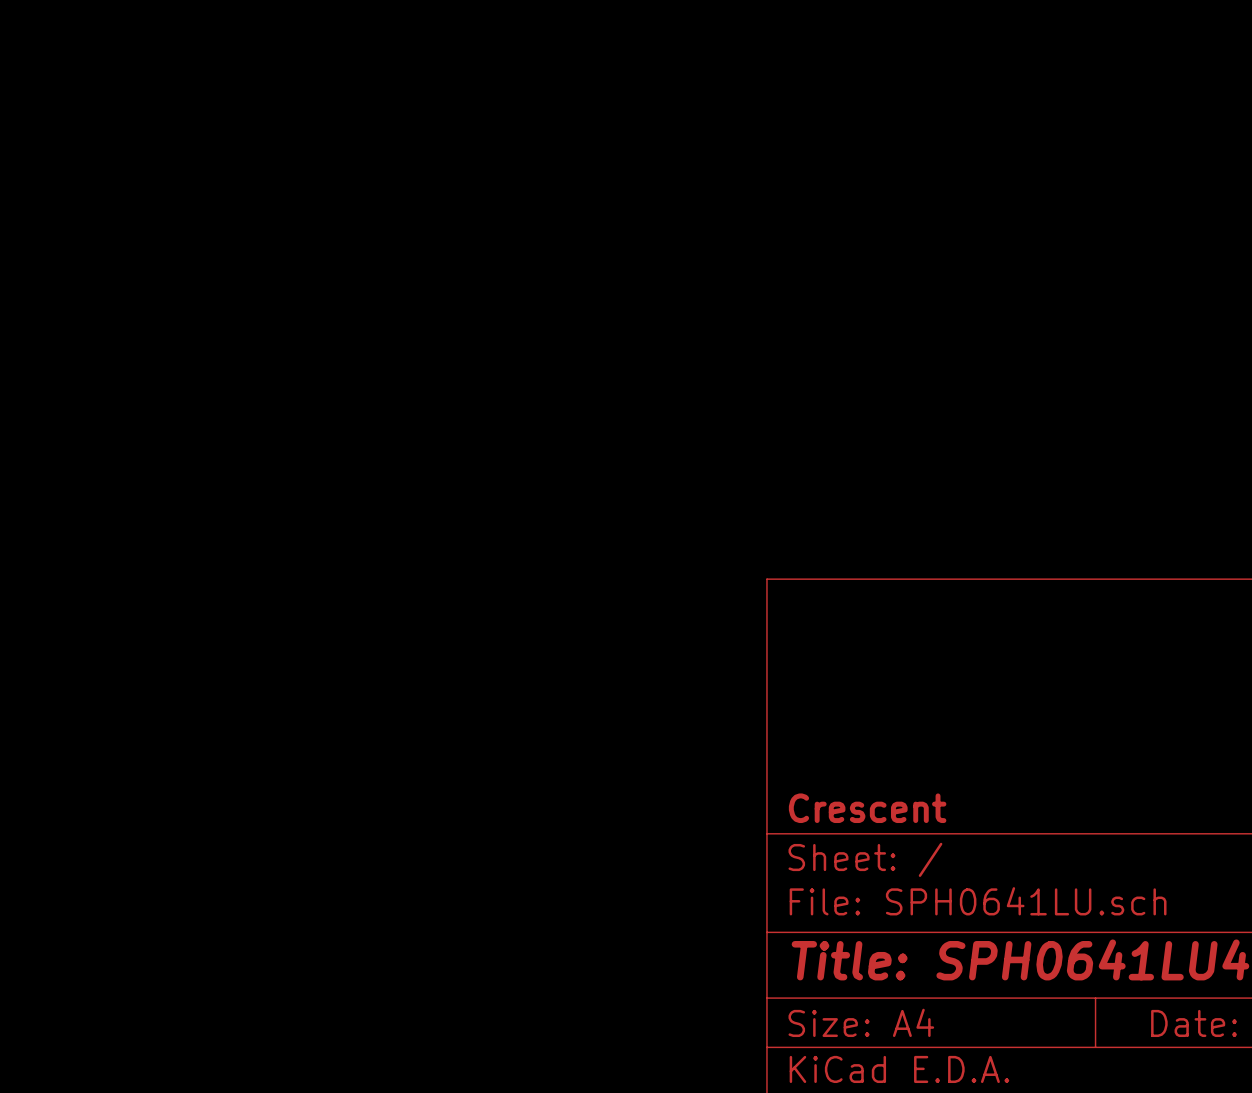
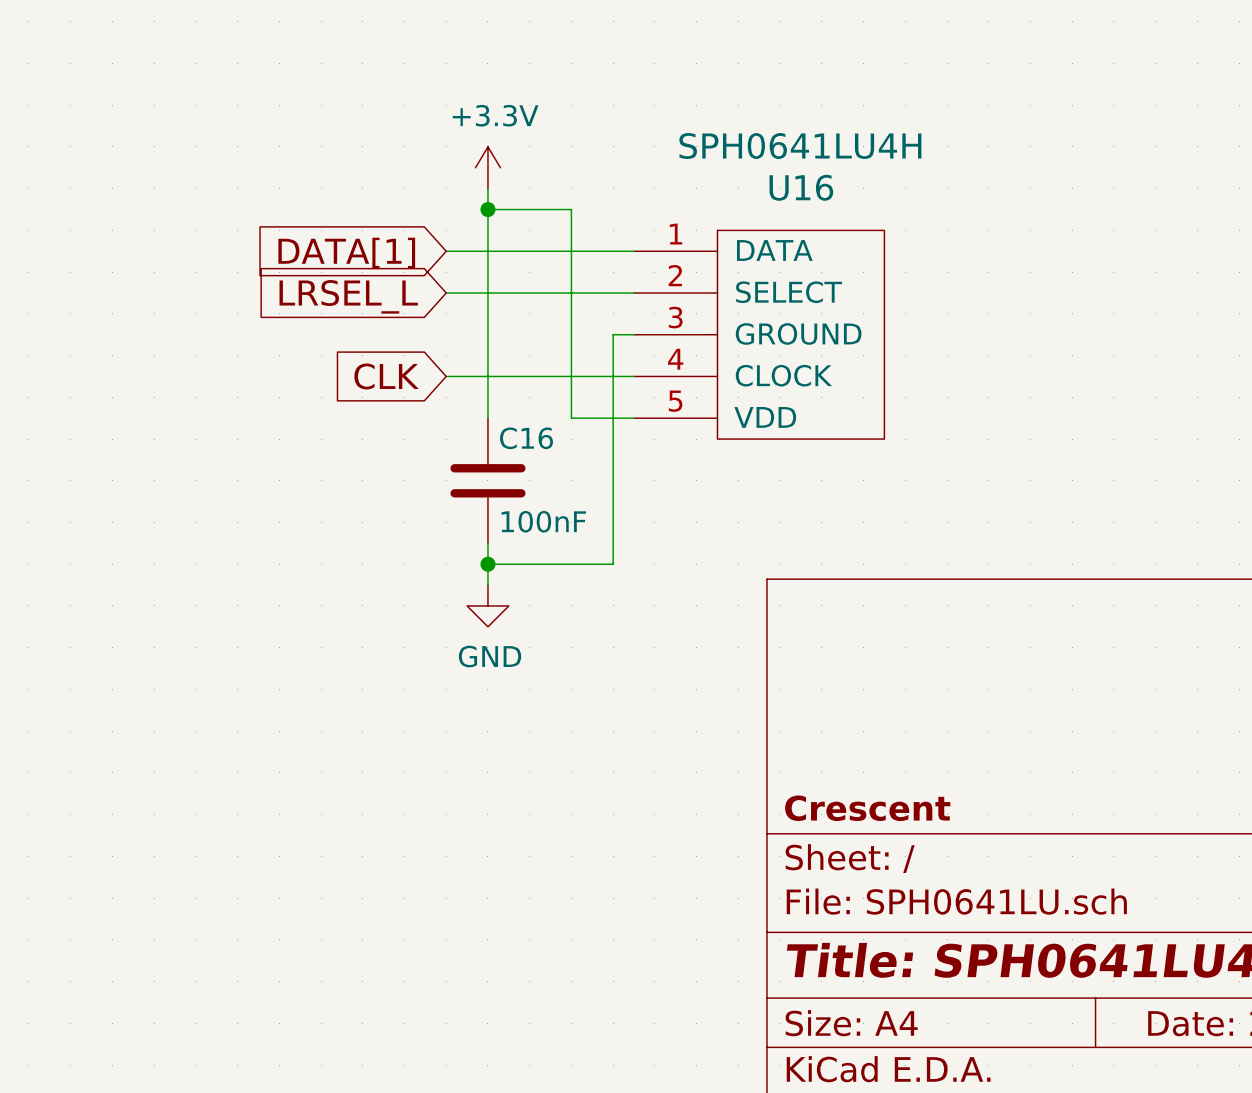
power symbol: none -> +3.3V (487, 167)
wire: none -> (487, 188) (487, 418)
wire: none -> (487, 209) (571, 209) (571, 418) (634, 418)
junction: none -> (487, 209)
wire: none -> (446, 251) (634, 251)
global label: none -> DATA[1] (346, 253)
wire: none -> (446, 293) (634, 293)
global label: none -> LRSEL_L (348, 296)
wire: none -> (634, 334) (613, 334) (613, 564) (487, 564)
U16: none -> SPH0641LU4H (759, 366)
global label: none -> CLK (386, 376)
wire: none -> (446, 376) (634, 376)
C16: none -> 100nF (487, 480)
wire: none -> (487, 543) (487, 585)
junction: none -> (487, 564)
power symbol: none -> GND (487, 605)

